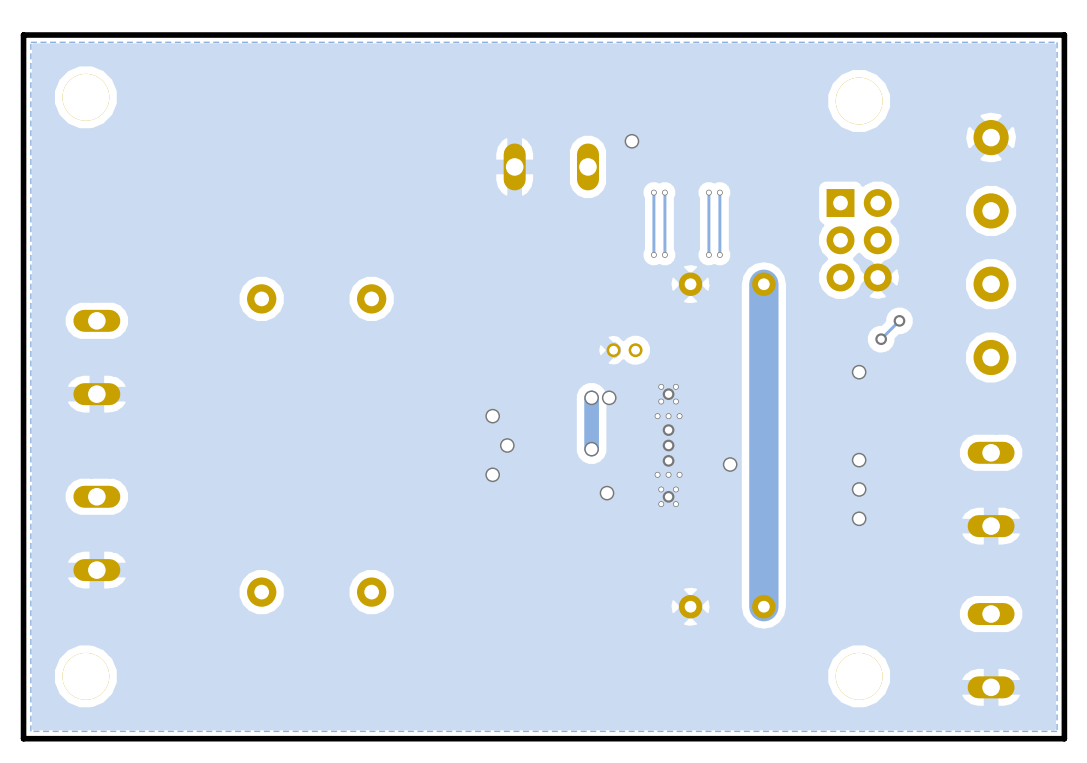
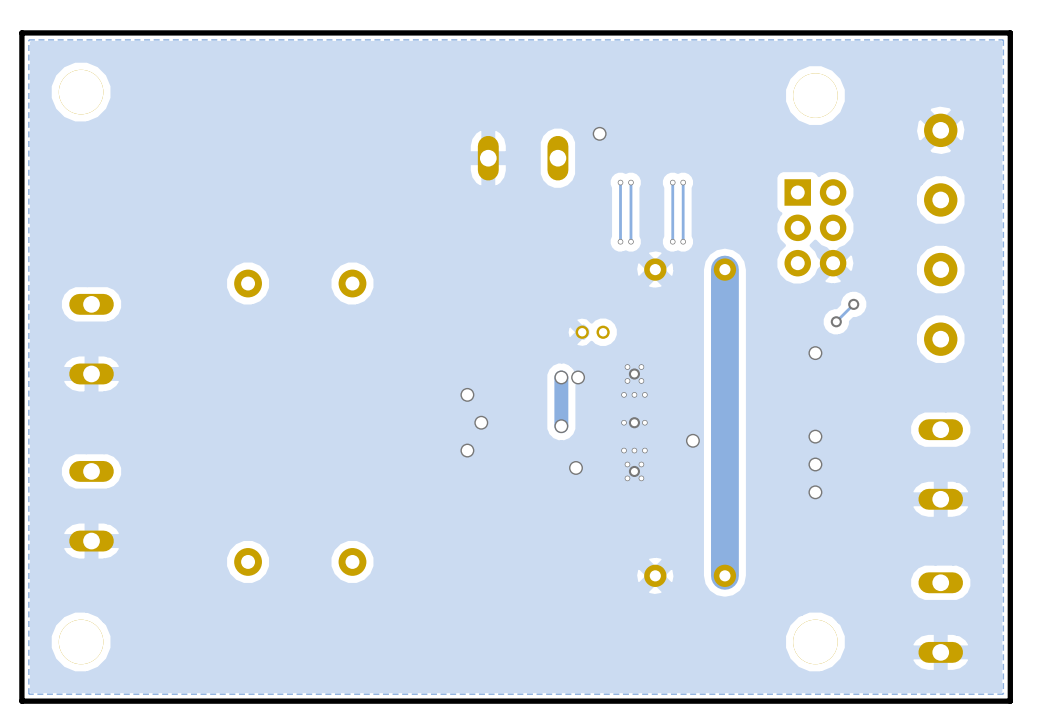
via: (668, 430) -> none
via: none -> (624, 422)
via: none -> (644, 422)
via: (668, 460) -> none

